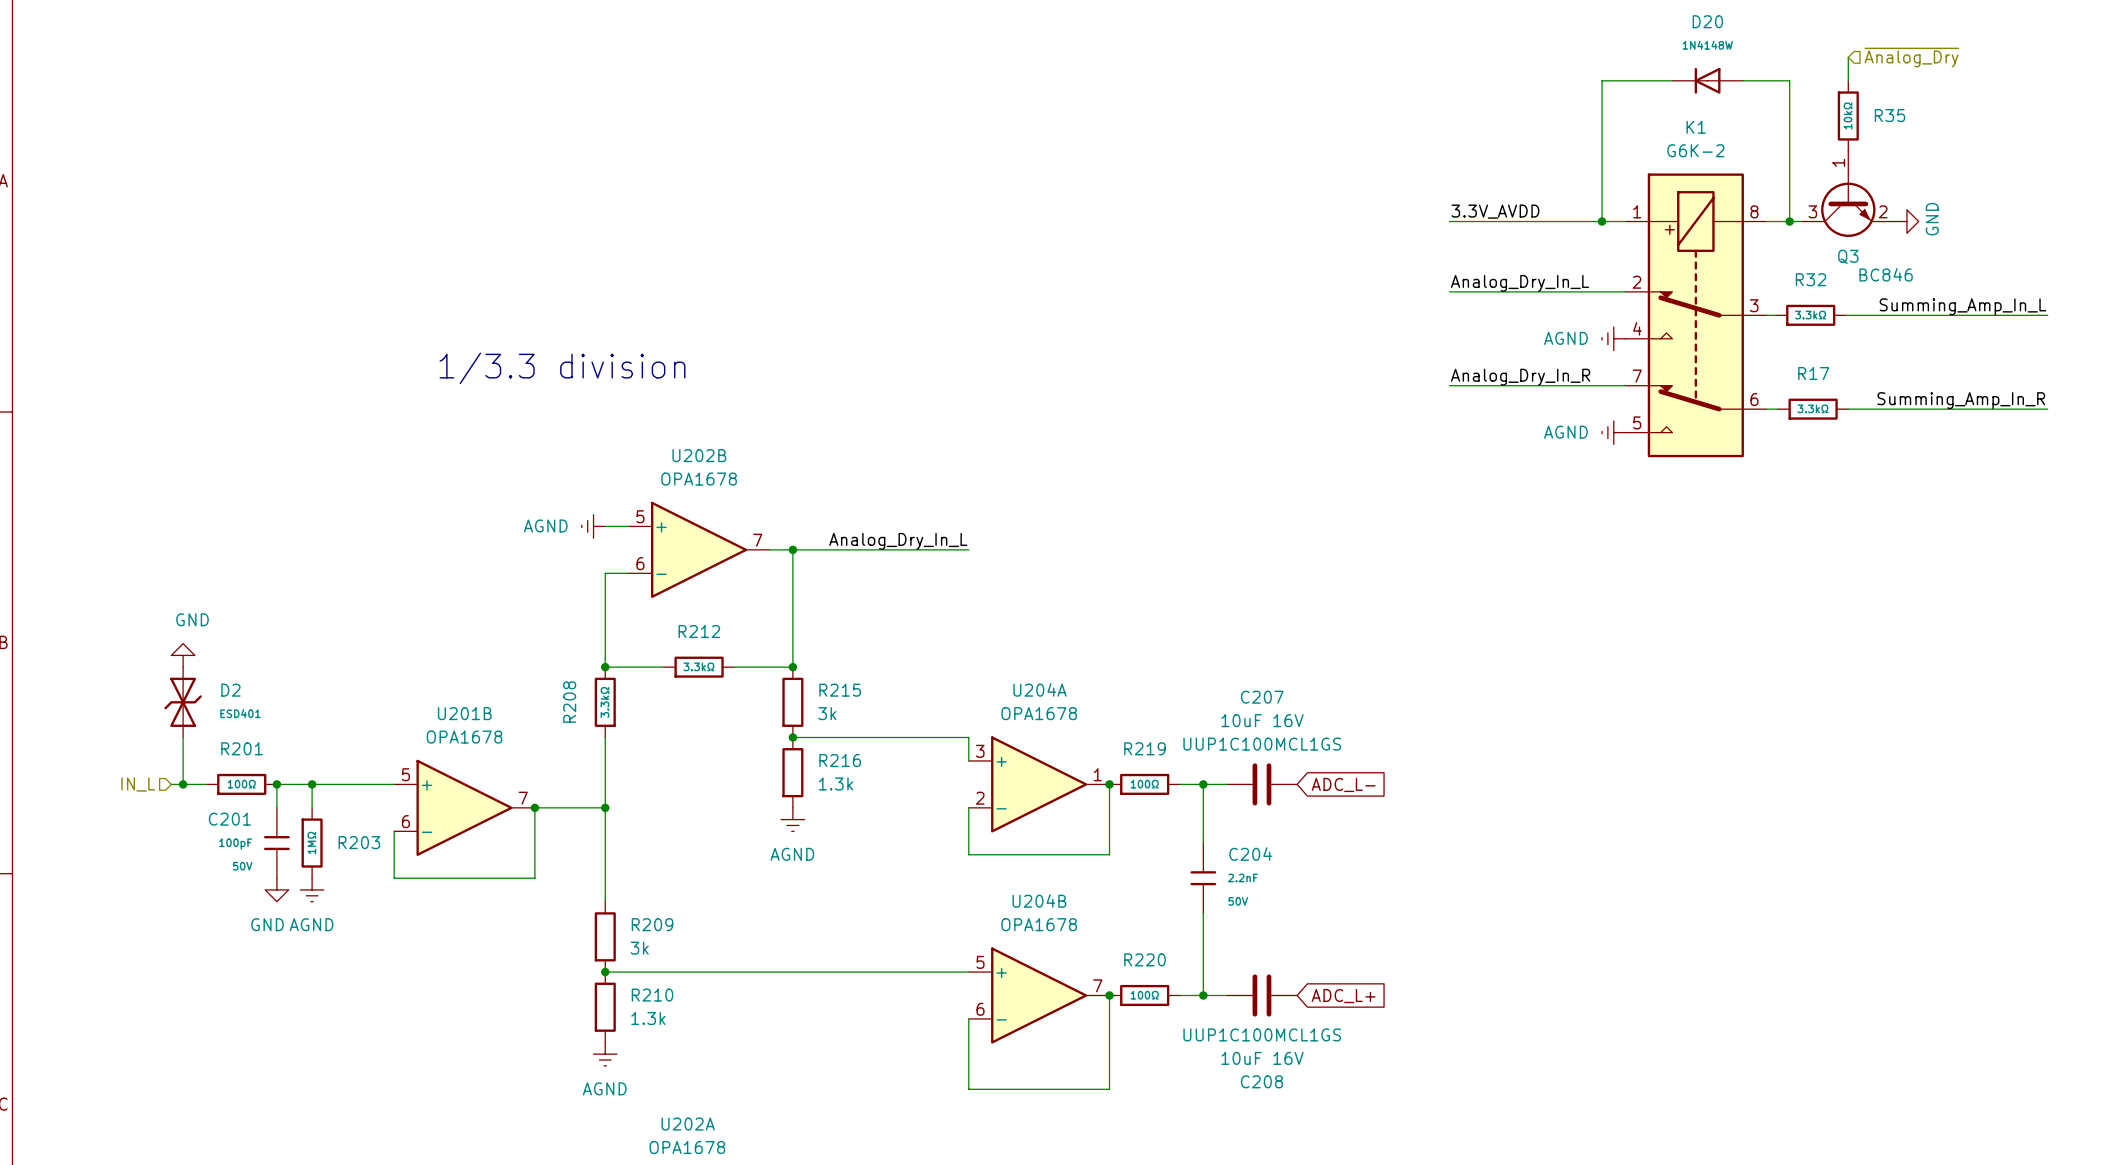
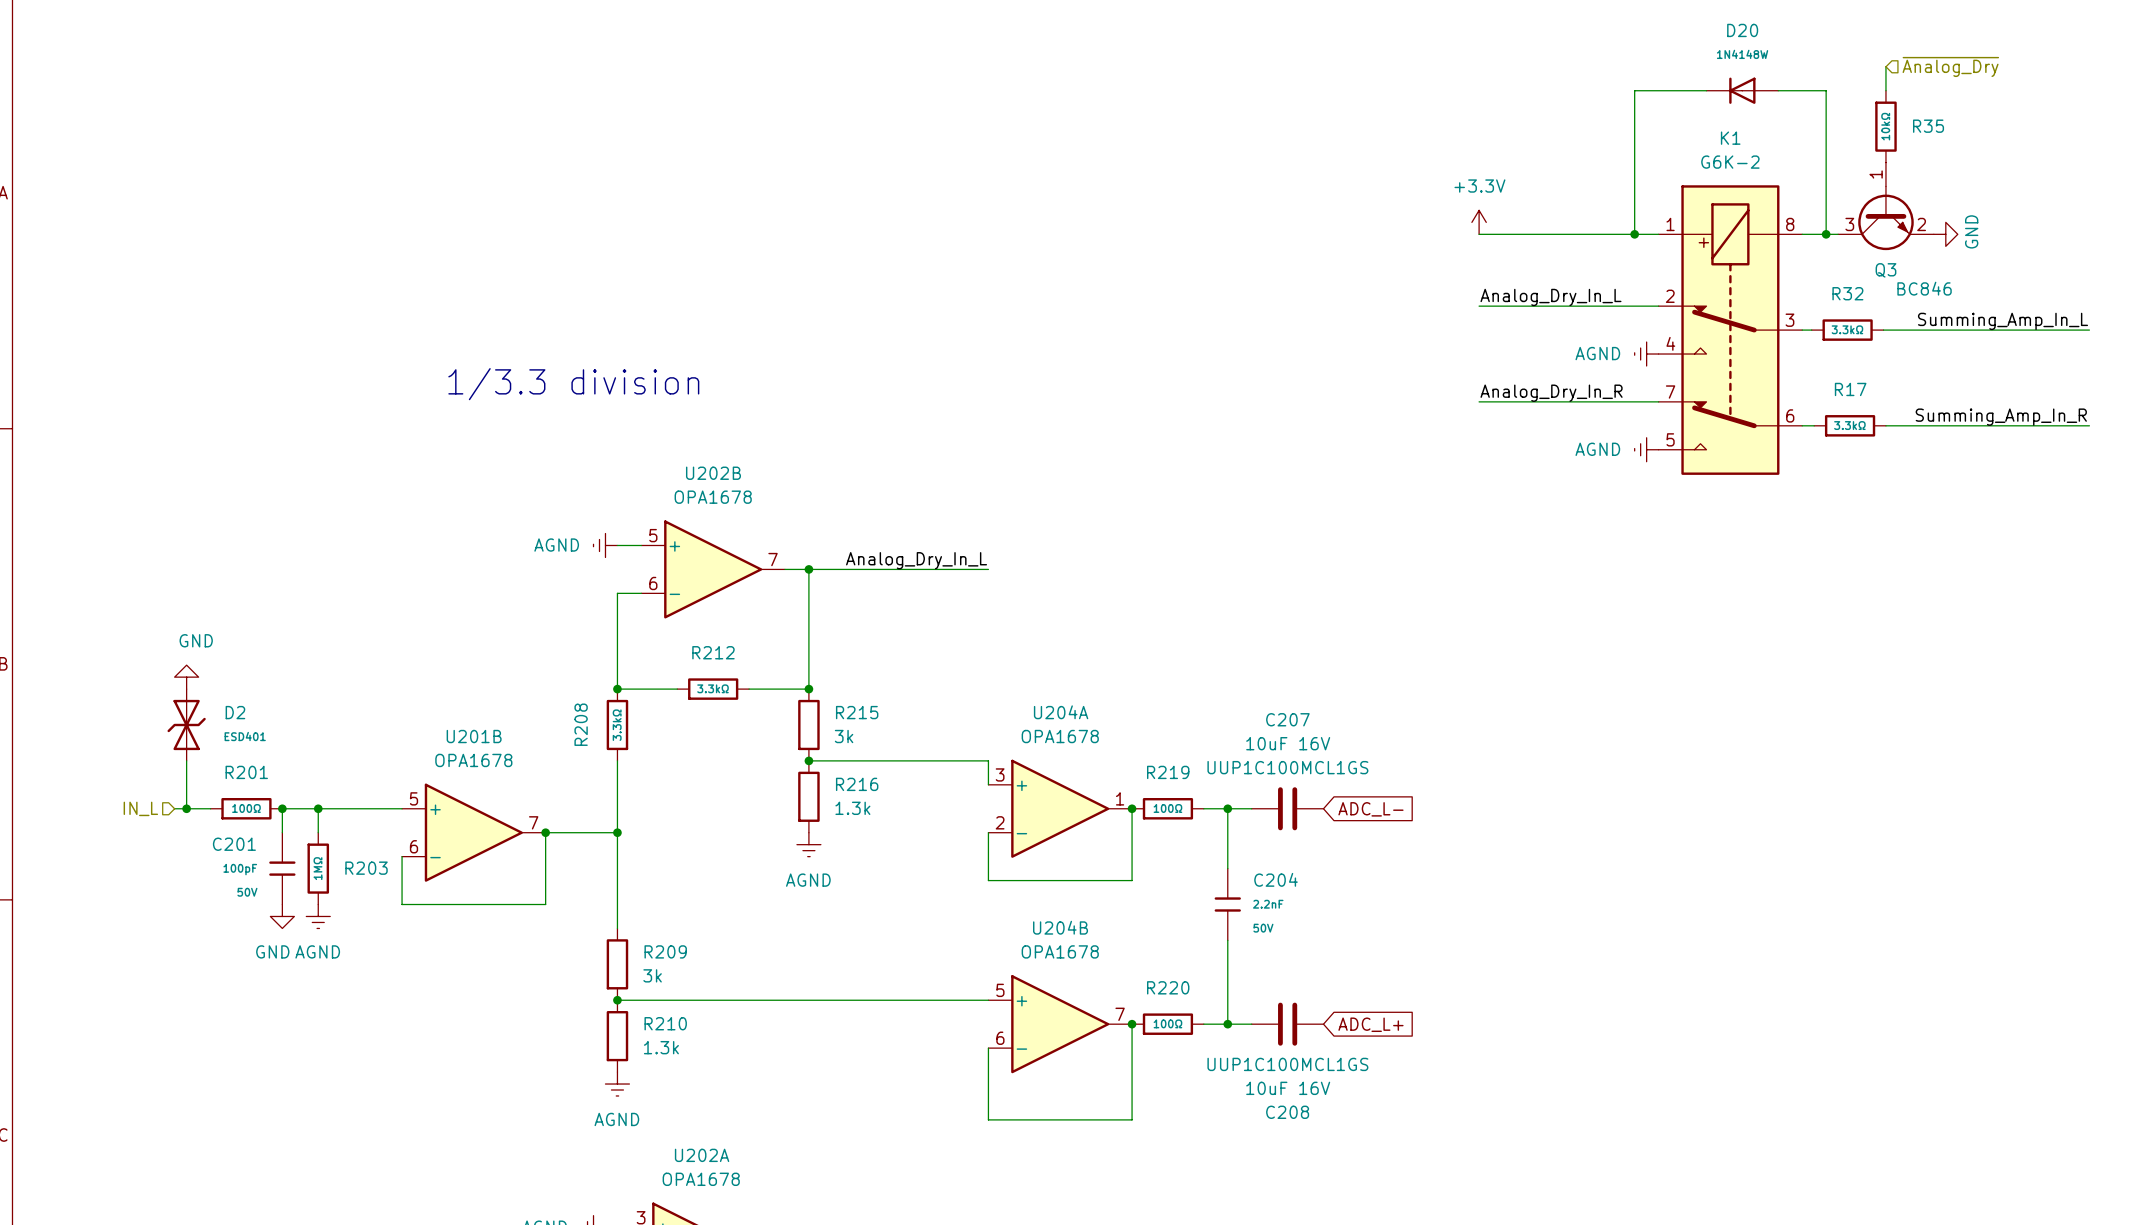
power symbol: none -> +3.3V (1479, 222)
label: 3.3V_AVDD (1495, 211) -> none

